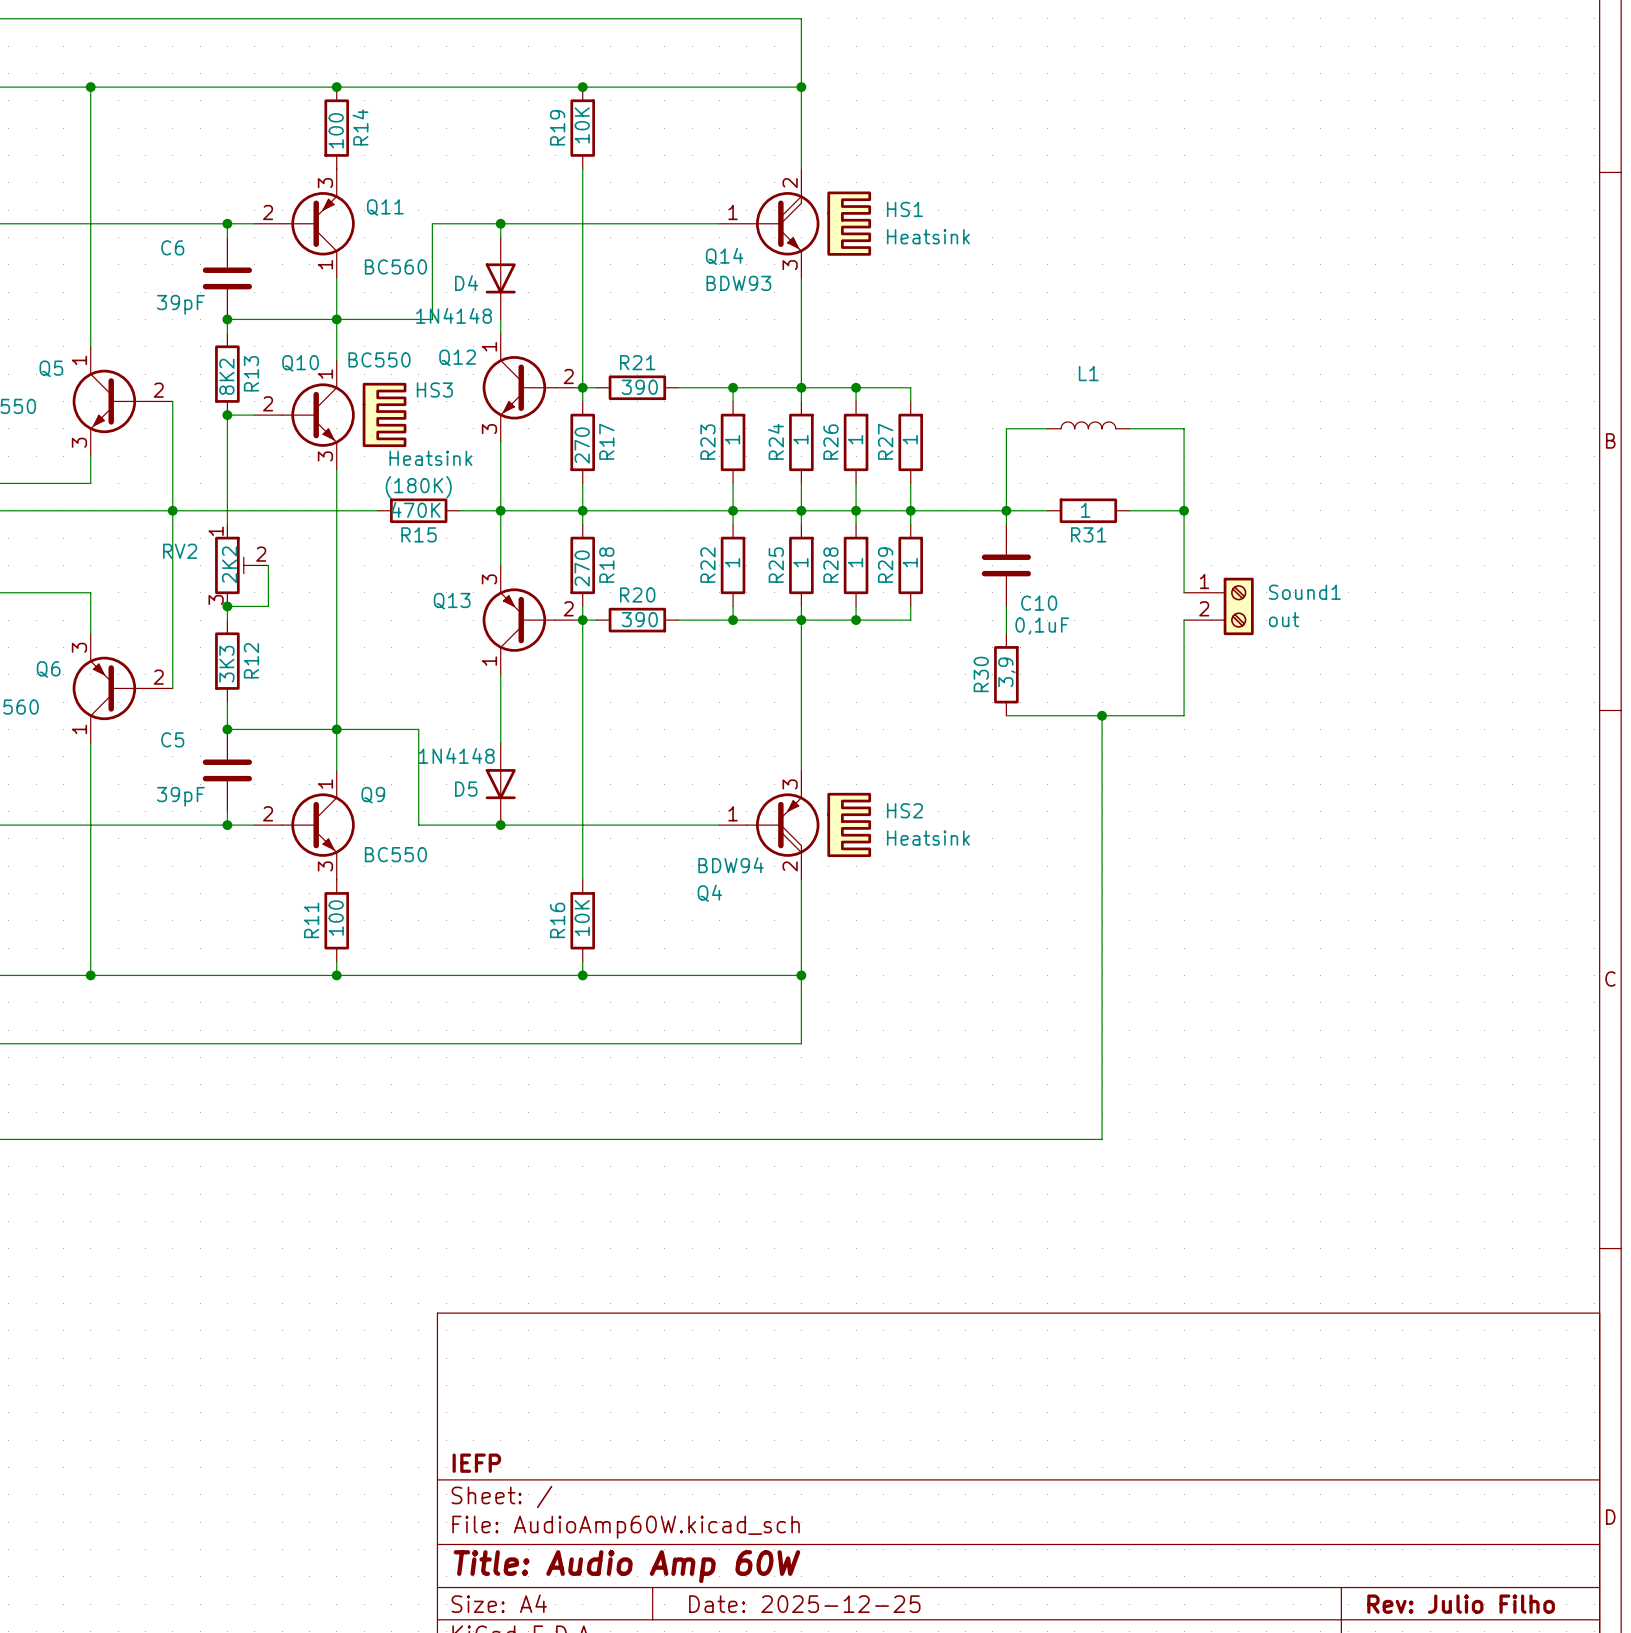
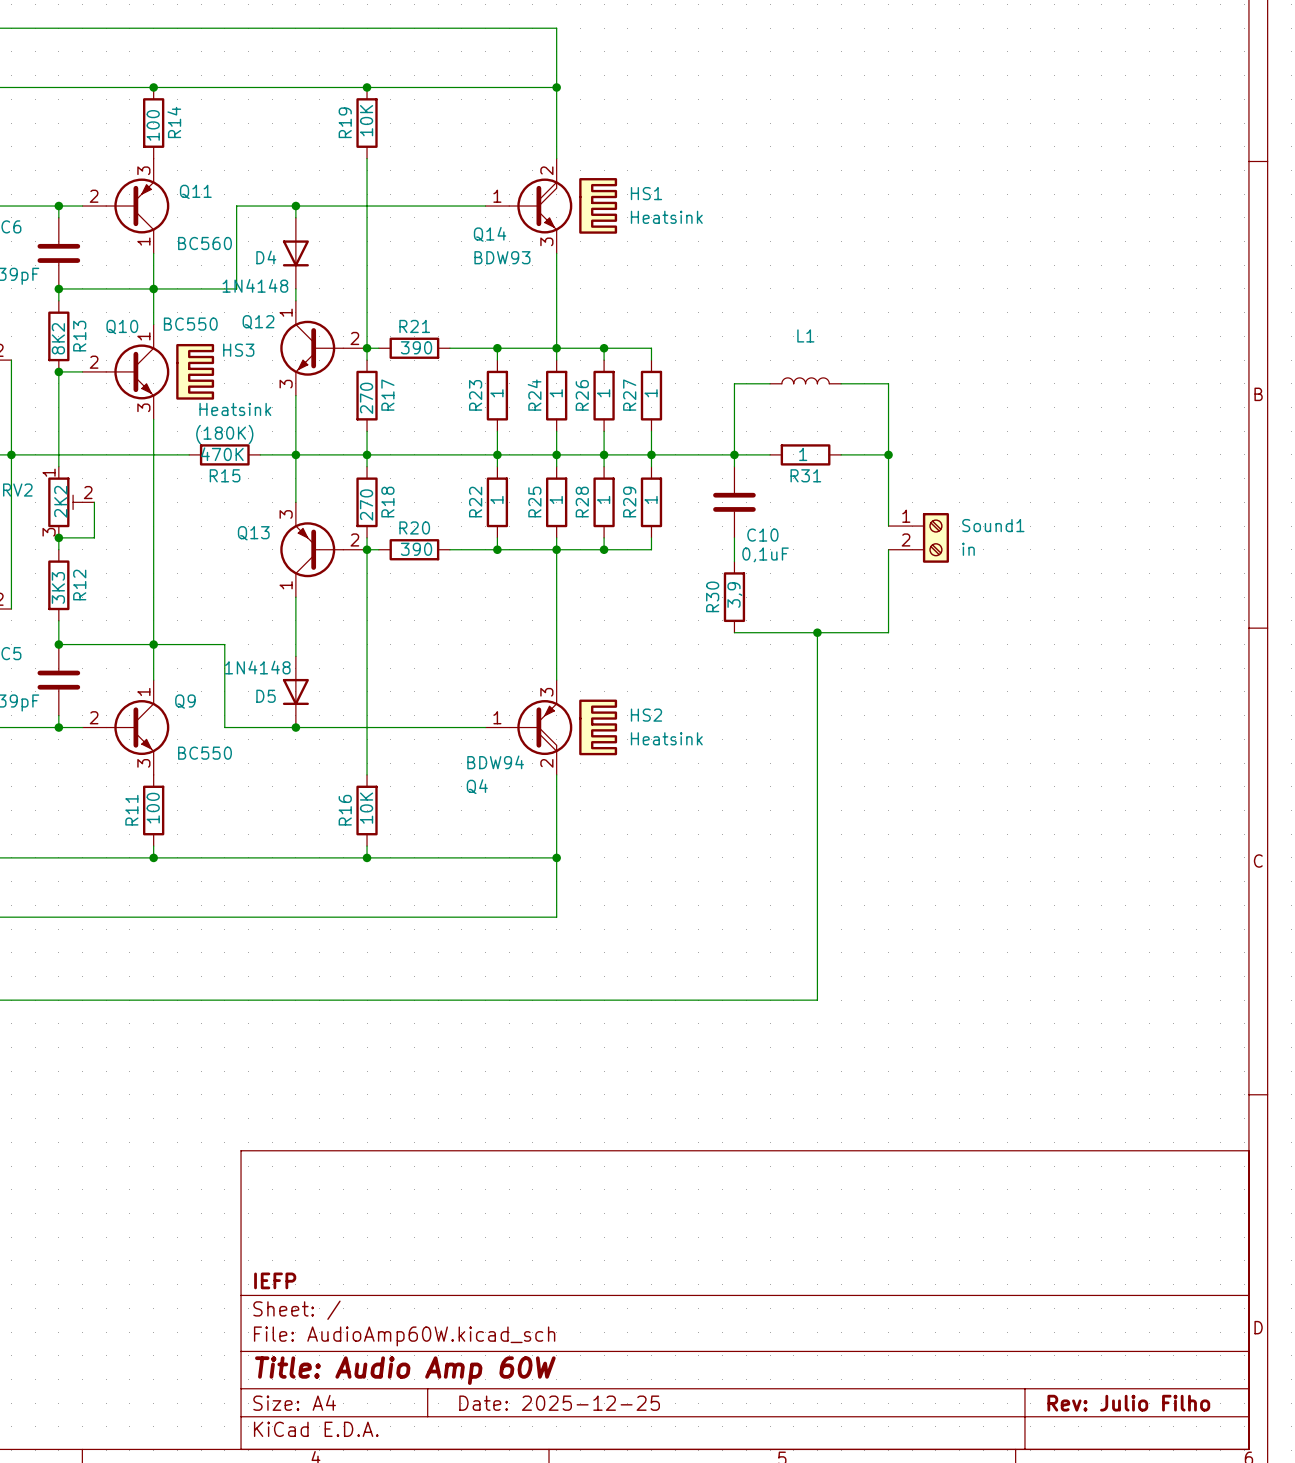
Sound1 value: out (1284, 619) -> in (968, 549)

